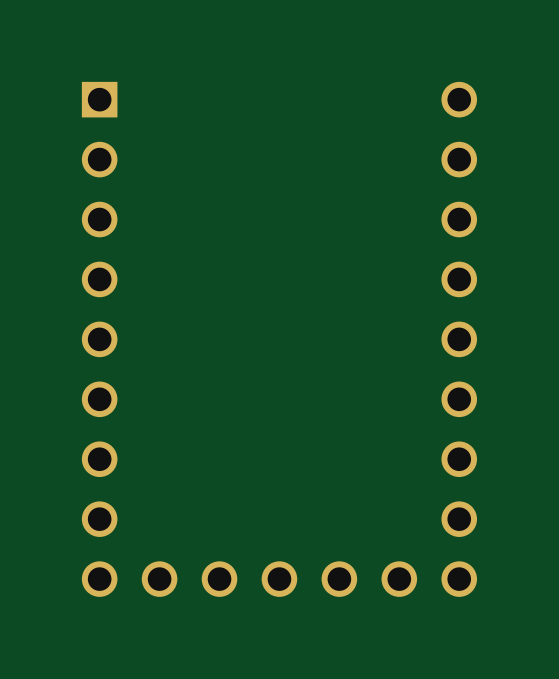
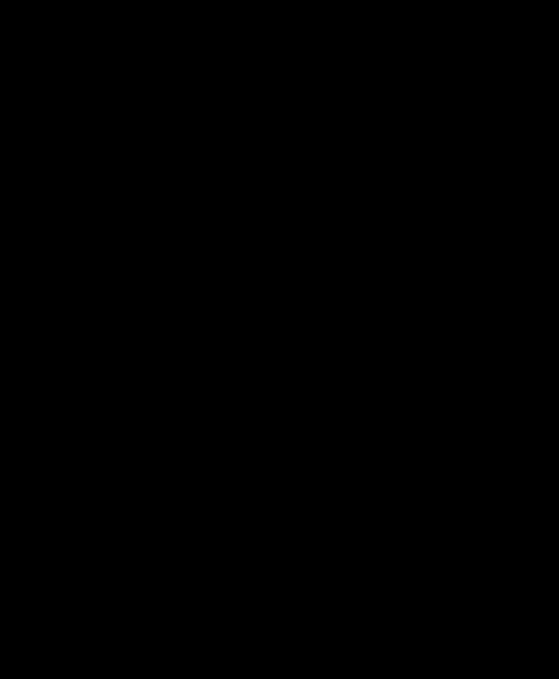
part: (279, 339) -> none

